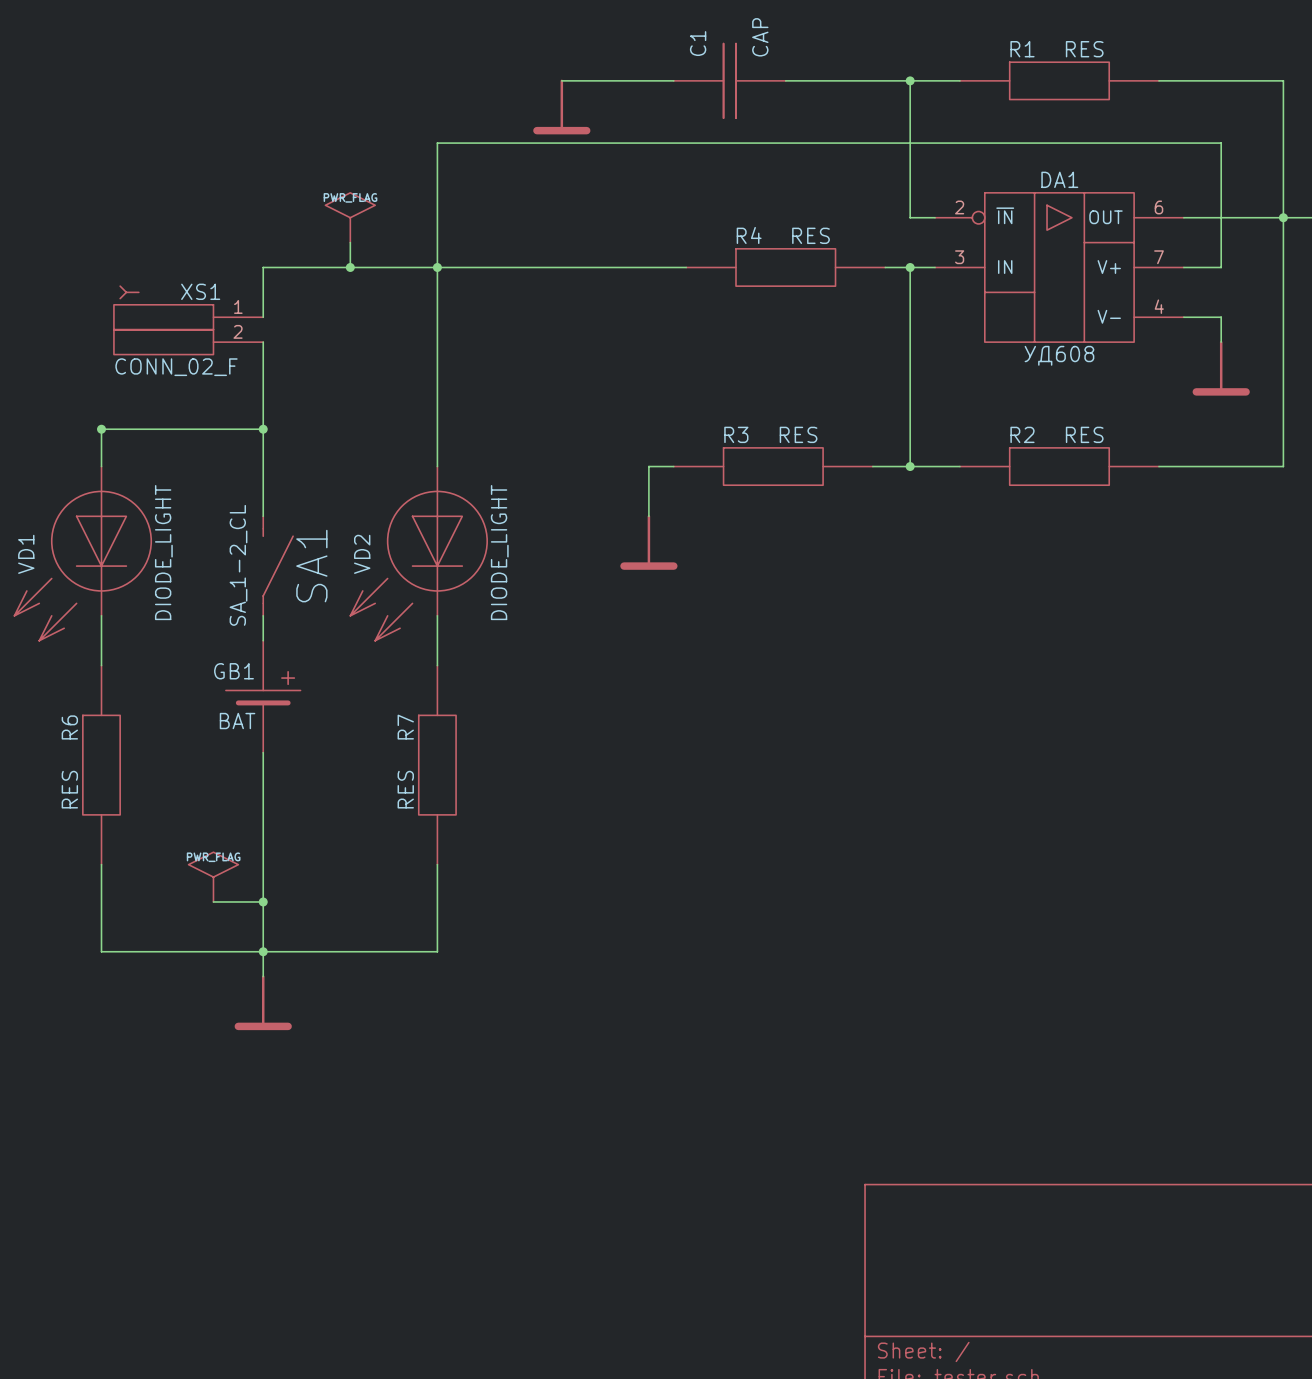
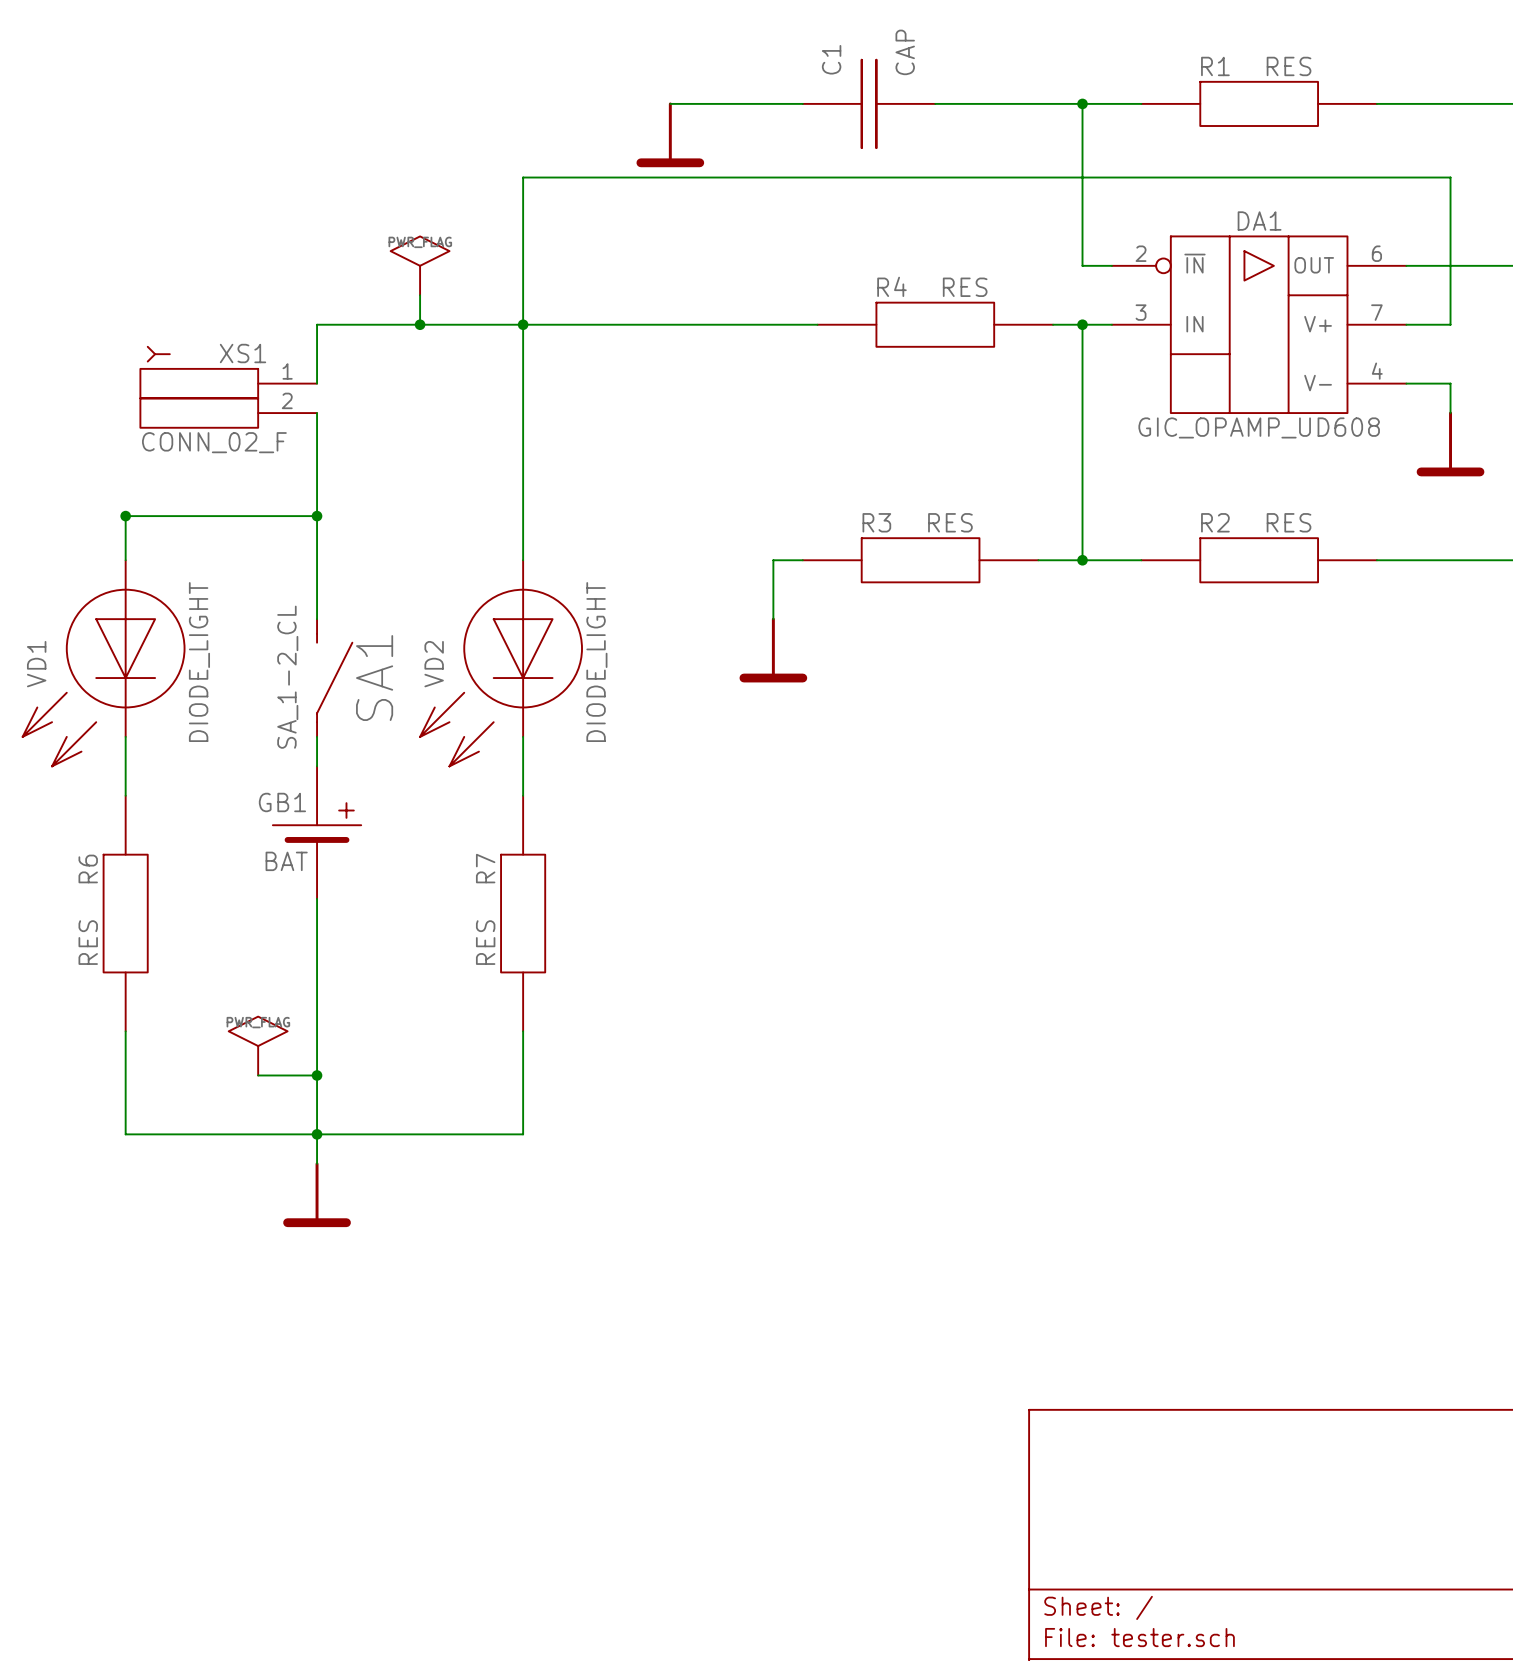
DA1 value: УД608 (1059, 355) -> GIC_OPAMP_UD608 (1259, 427)

